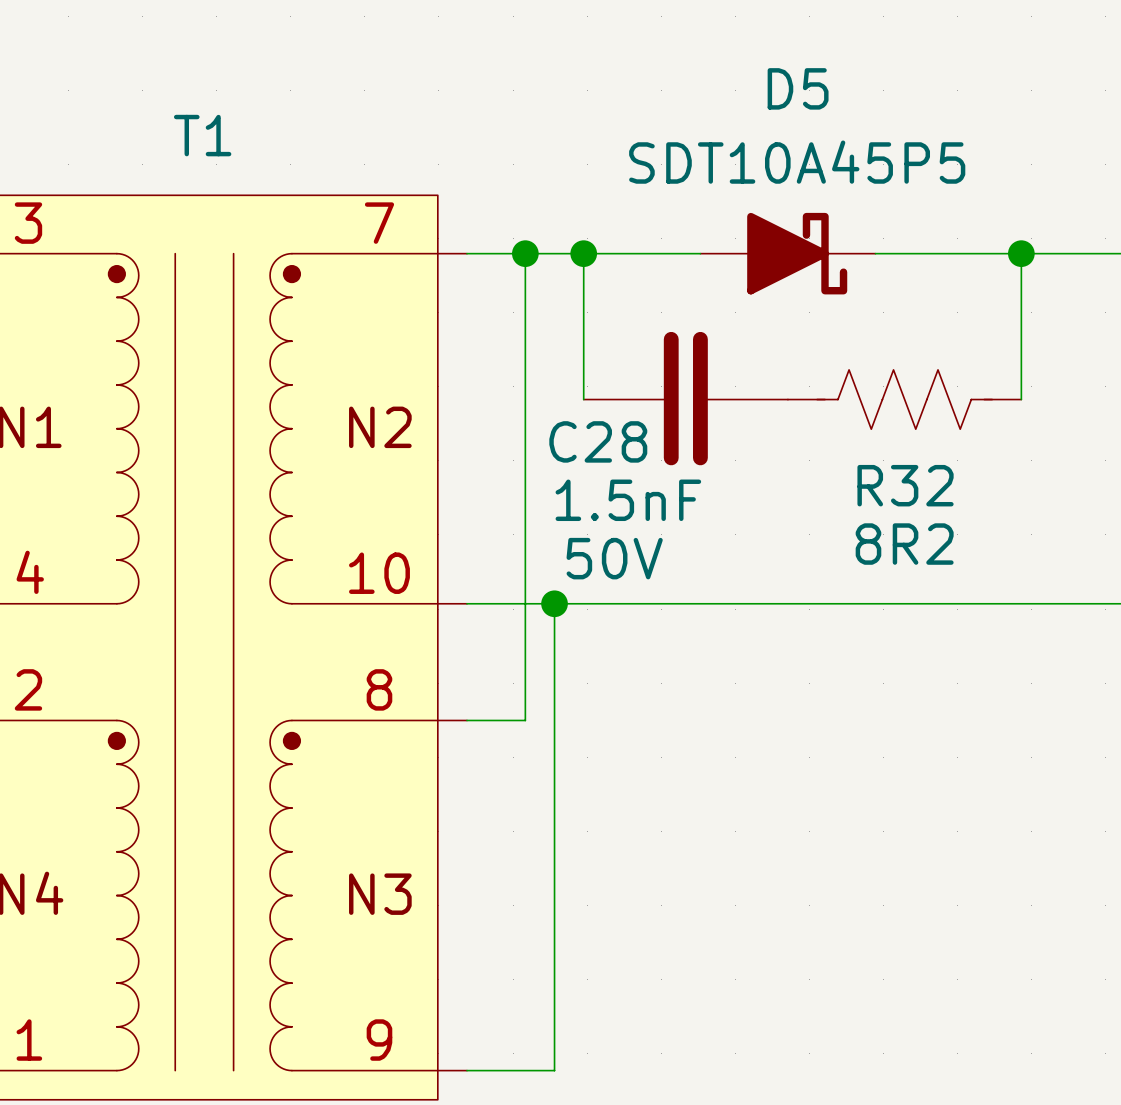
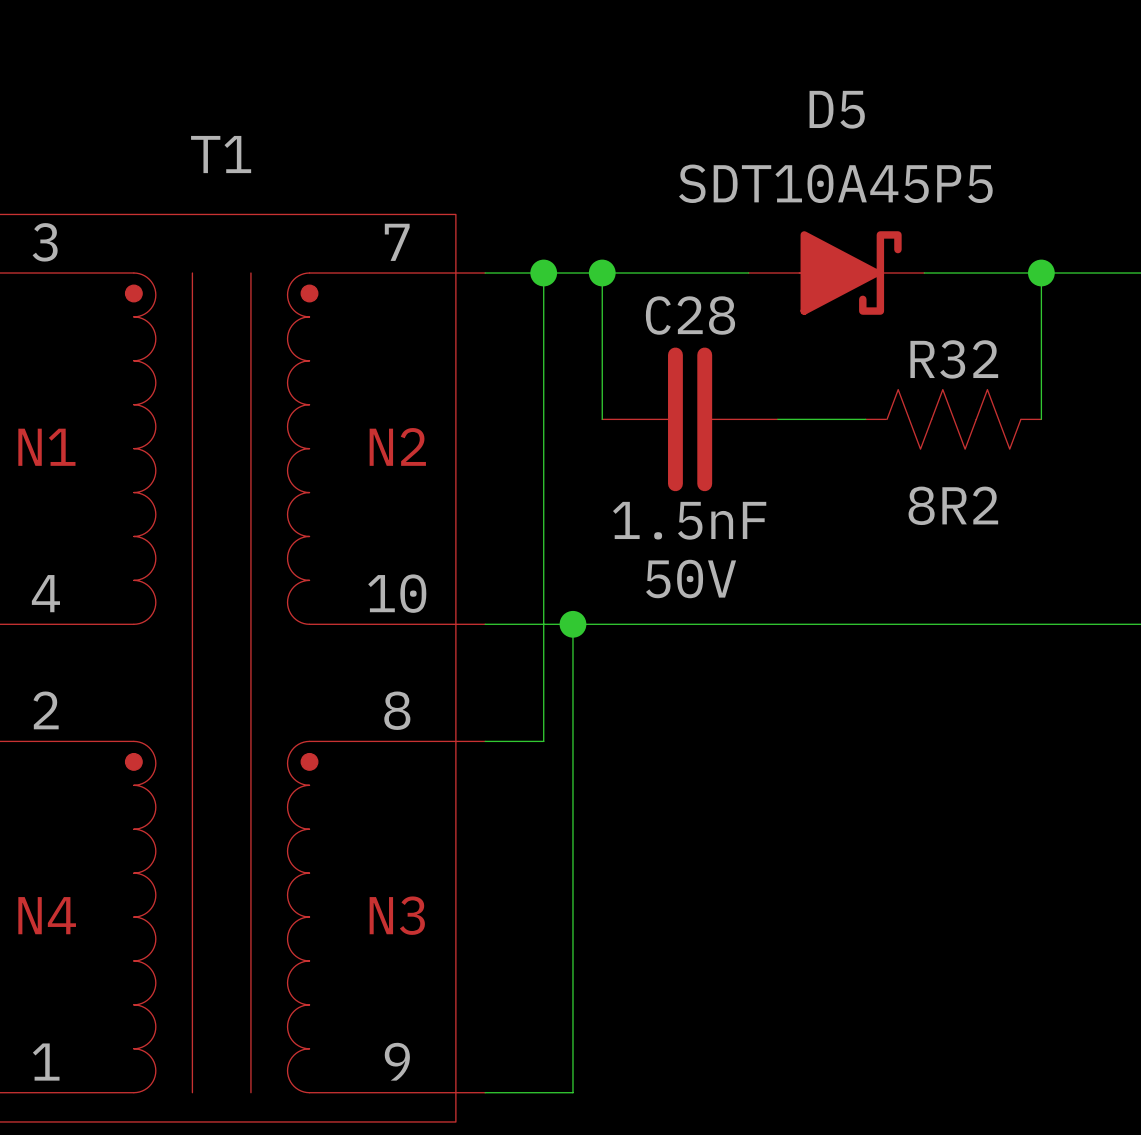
D5 symbol: [700, 212, 876, 295] -> [748, 231, 925, 315]
C28 symbol: [583, 331, 788, 466] -> [602, 347, 778, 492]
R32 symbol: [787, 369, 1022, 430] -> [865, 389, 1042, 450]
C28 name position: C28 (598, 441) -> C28 (690, 315)
R32 name position: R32 (905, 485) -> R32 (954, 359)
C28 value position: 1.5nF (628, 500) -> 1.5nF (689, 520)
C28 text position: 50V (614, 558) -> 50V (691, 579)

